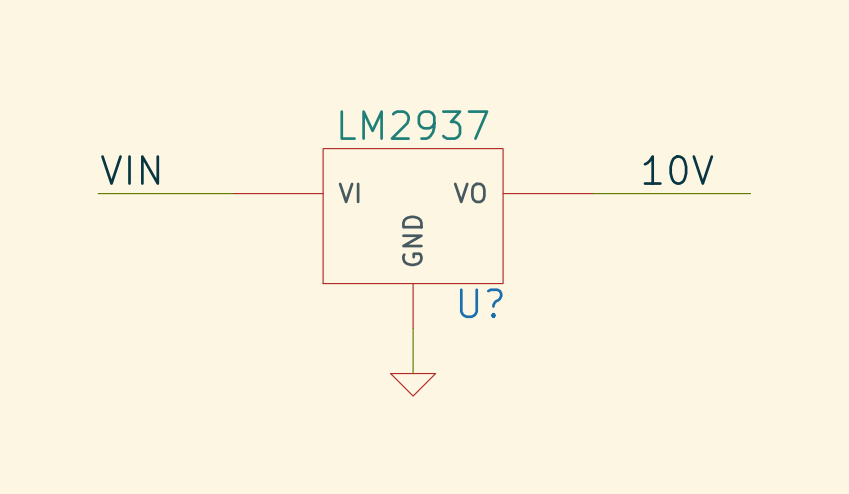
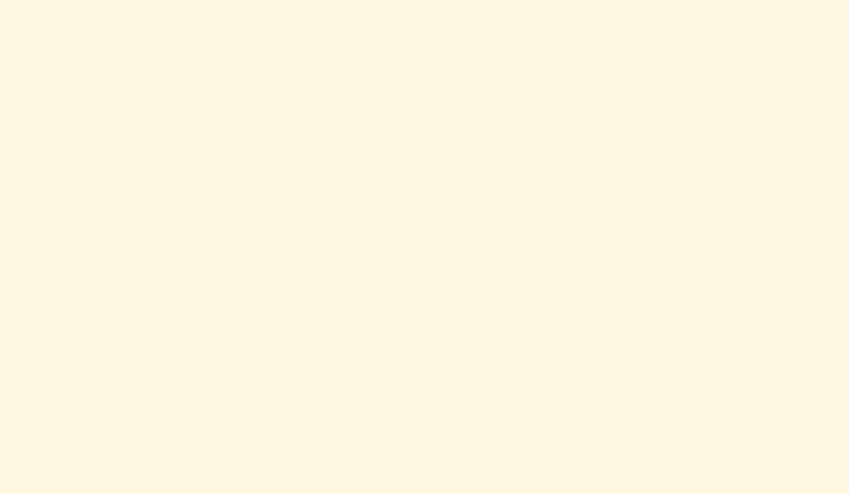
label: VIN (130, 170) -> none
label: 10V (678, 170) -> none
wire: (98, 193) (233, 193) -> none
wire: (593, 193) (750, 193) -> none
U?: LM2937 (413, 238) -> none
wire: (413, 328) (413, 373) -> none
power symbol: (413, 384) -> none

